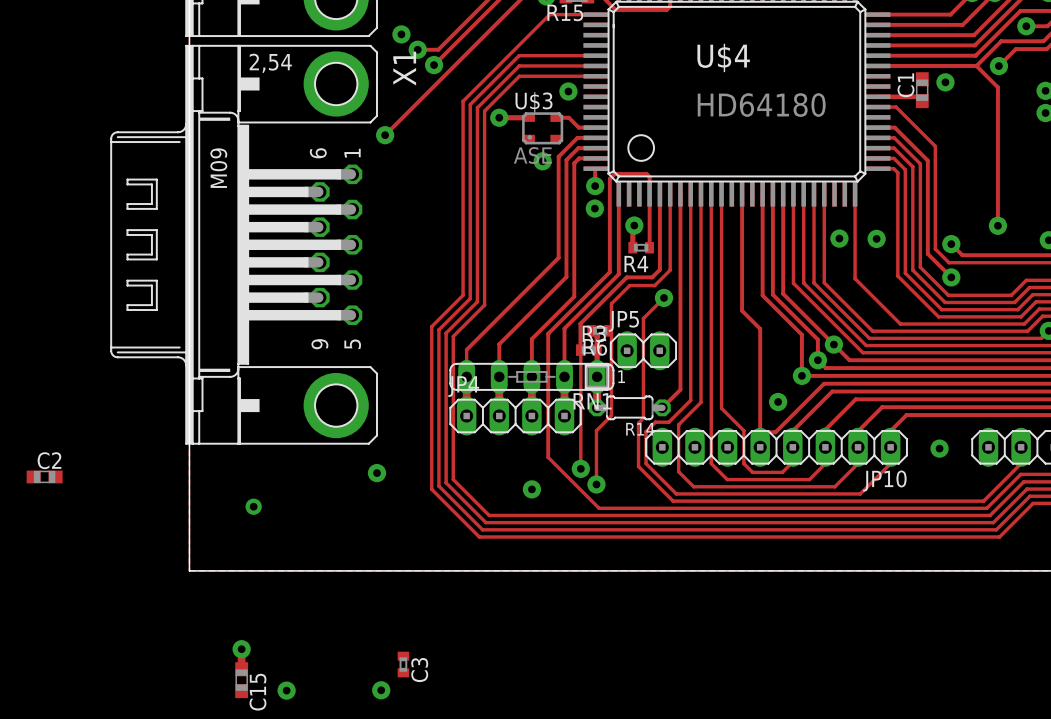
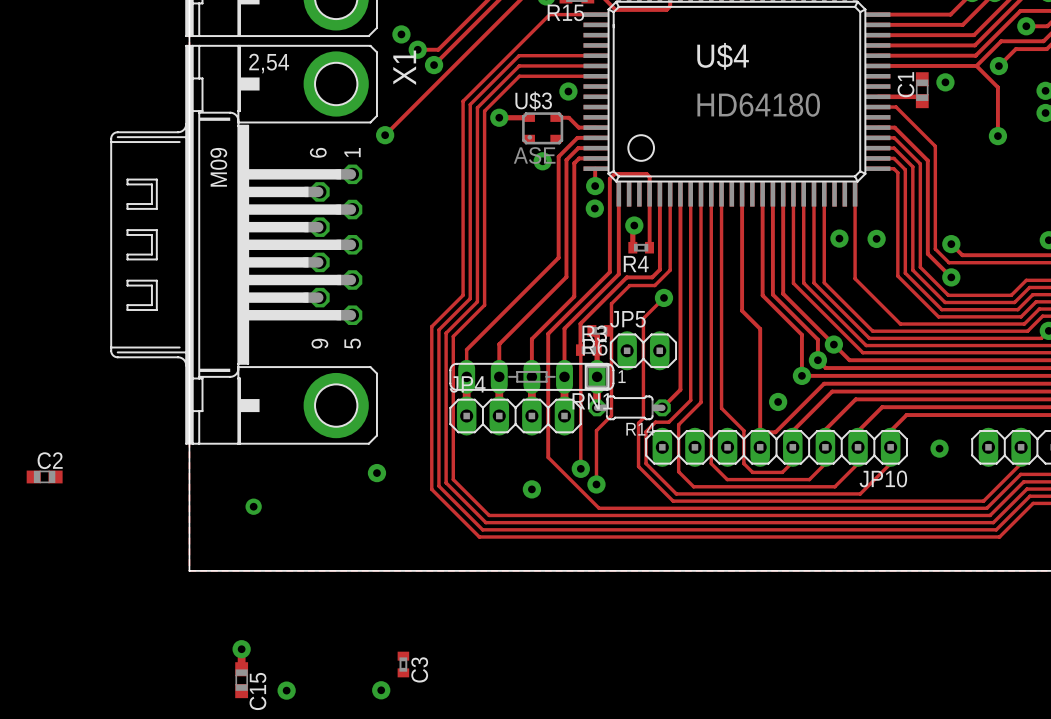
track: (997, 136) (997, 225) -> none
via: none -> (997, 136)
via: (997, 225) -> none

